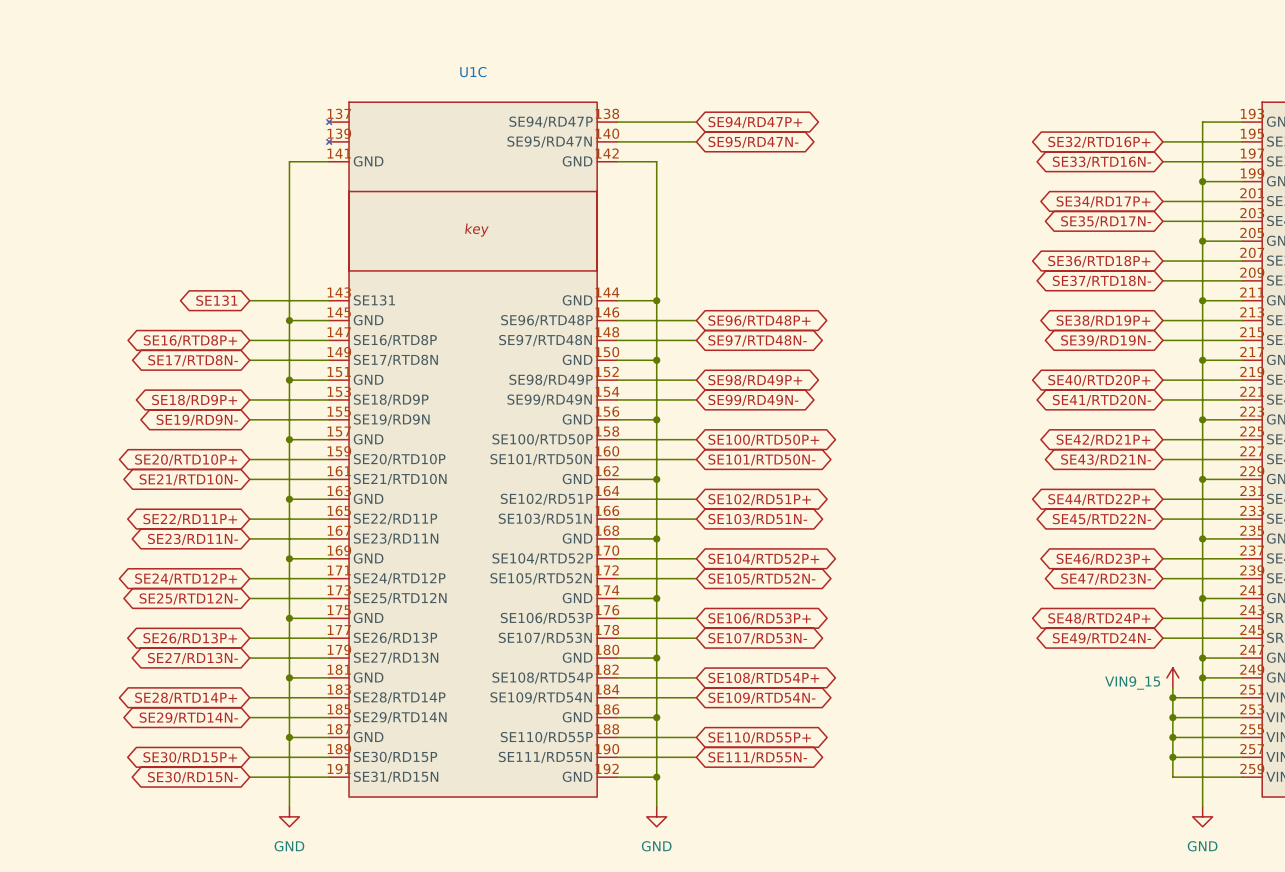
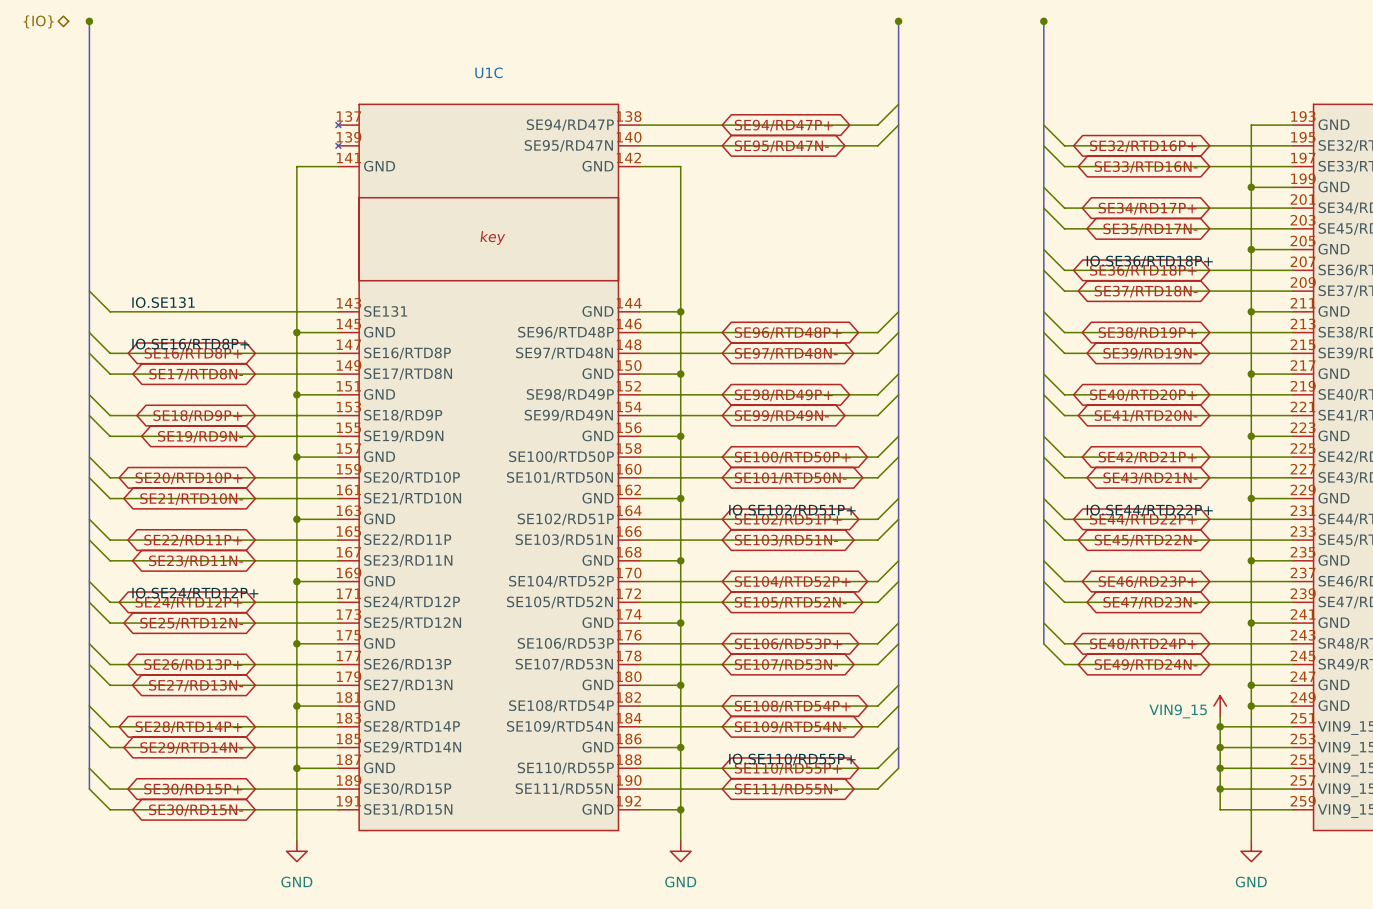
bus: none -> (89, 21) (89, 789)
junction: none -> (89, 21)
bus: none -> (898, 21) (898, 768)
junction: none -> (898, 21)
bus: none -> (1043, 21) (1043, 643)
junction: none -> (1043, 21)
hierarchical label: none -> {IO} (38, 21)
wire: none -> (898, 104) (877, 125) (722, 125)
wire: none -> (898, 125) (877, 145) (722, 145)
wire: none -> (1043, 125) (1064, 145) (1209, 145)
wire: none -> (1043, 145) (1064, 166) (1209, 166)
wire: none -> (1043, 187) (1064, 208) (1209, 208)
wire: none -> (1043, 208) (1064, 228) (1209, 228)
wire: none -> (1043, 249) (1064, 270) (1209, 270)
label: none -> IO.SE36/RTD18P+ (1149, 261)
wire: none -> (1043, 270) (1064, 291) (1209, 291)
wire: none -> (89, 291) (110, 311) (255, 311)
label: none -> IO.SE131 (163, 302)
global label: SE131 (216, 300) -> none
wire: none -> (898, 311) (877, 332) (722, 332)
wire: none -> (1043, 311) (1064, 332) (1209, 332)
wire: none -> (89, 332) (110, 353) (255, 353)
wire: none -> (898, 332) (877, 353) (722, 353)
wire: none -> (1043, 332) (1064, 353) (1209, 353)
label: none -> IO.SE16/RTD8P+ (190, 344)
wire: none -> (89, 353) (110, 374) (255, 374)
wire: none -> (898, 374) (877, 394) (722, 394)
wire: none -> (1043, 374) (1064, 394) (1209, 394)
wire: none -> (89, 394) (110, 415) (255, 415)
wire: none -> (898, 394) (877, 415) (722, 415)
wire: none -> (1043, 394) (1064, 415) (1209, 415)
wire: none -> (89, 415) (110, 436) (255, 436)
wire: none -> (898, 436) (877, 457) (722, 457)
wire: none -> (1043, 436) (1064, 457) (1209, 457)
wire: none -> (89, 457) (110, 477) (255, 477)
wire: none -> (898, 457) (877, 477) (722, 477)
wire: none -> (1043, 457) (1064, 477) (1209, 477)
wire: none -> (89, 477) (110, 498) (255, 498)
wire: none -> (898, 498) (877, 519) (722, 519)
wire: none -> (1043, 498) (1064, 519) (1209, 519)
label: none -> IO.SE102/RD51P+ (792, 510)
label: none -> IO.SE44/RTD22P+ (1149, 510)
wire: none -> (89, 519) (110, 540) (255, 540)
wire: none -> (898, 519) (877, 540) (722, 540)
wire: none -> (1043, 519) (1064, 540) (1209, 540)
wire: none -> (89, 540) (110, 560) (255, 560)
wire: none -> (898, 560) (877, 581) (722, 581)
wire: none -> (1043, 560) (1064, 581) (1209, 581)
wire: none -> (89, 581) (110, 602) (255, 602)
wire: none -> (898, 581) (877, 602) (722, 602)
wire: none -> (1043, 581) (1064, 602) (1209, 602)
label: none -> IO.SE24/RTD12P+ (195, 593)
wire: none -> (89, 602) (110, 623) (255, 623)
wire: none -> (898, 623) (877, 643) (722, 643)
wire: none -> (1043, 623) (1064, 643) (1209, 643)
wire: none -> (89, 643) (110, 664) (255, 664)
wire: none -> (898, 643) (877, 664) (722, 664)
wire: none -> (1043, 643) (1064, 664) (1209, 664)
wire: none -> (89, 664) (110, 685) (255, 685)
wire: none -> (898, 685) (877, 706) (722, 706)
wire: none -> (89, 706) (110, 726) (255, 726)
wire: none -> (898, 706) (877, 726) (722, 726)
wire: none -> (89, 726) (110, 747) (255, 747)
wire: none -> (898, 747) (877, 768) (722, 768)
label: none -> IO.SE110/RD55P+ (792, 759)
wire: none -> (89, 768) (110, 789) (255, 789)
wire: none -> (898, 768) (877, 789) (722, 789)
wire: none -> (89, 789) (110, 809) (255, 809)

